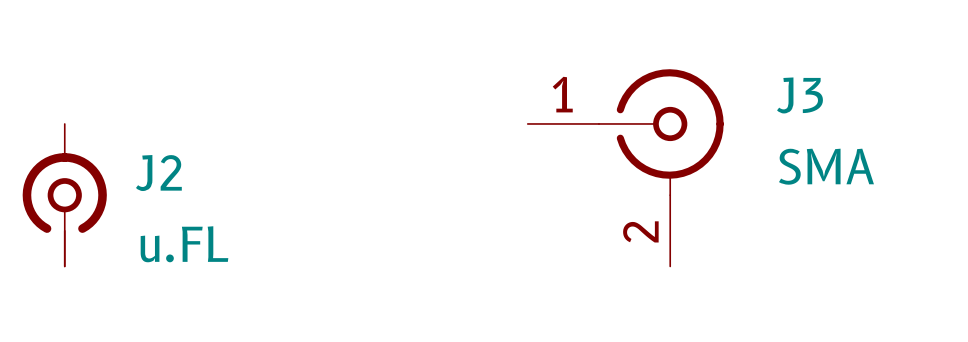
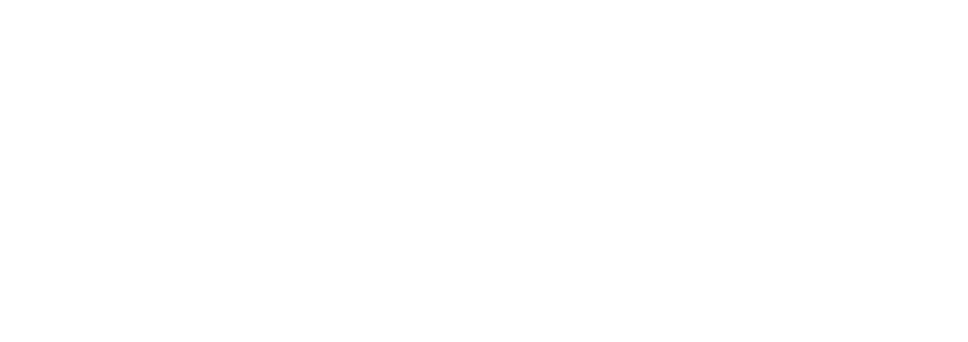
J3: SMA (625, 167) -> none
J2: u.FL (64, 195) -> none

